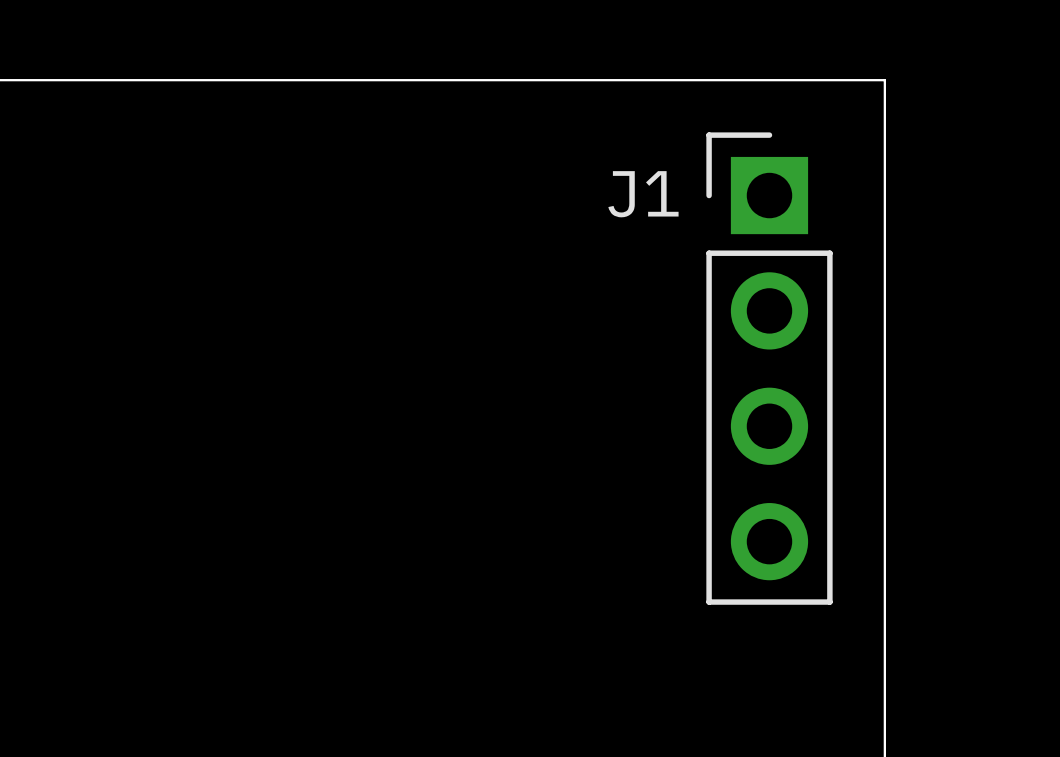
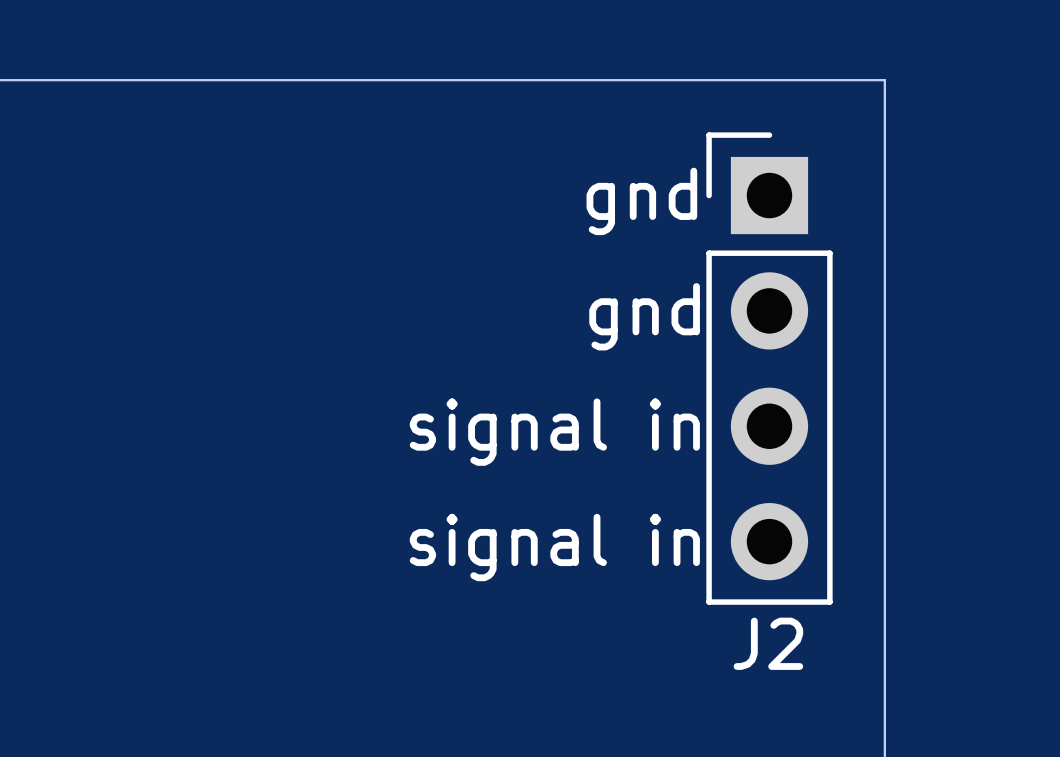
J1 name: J1 (643, 194) -> J2 (768, 643)
text: none -> gnd (641, 201)
text: none -> gnd (644, 316)
text: none -> signal in (554, 432)
text: none -> signal in (554, 547)

